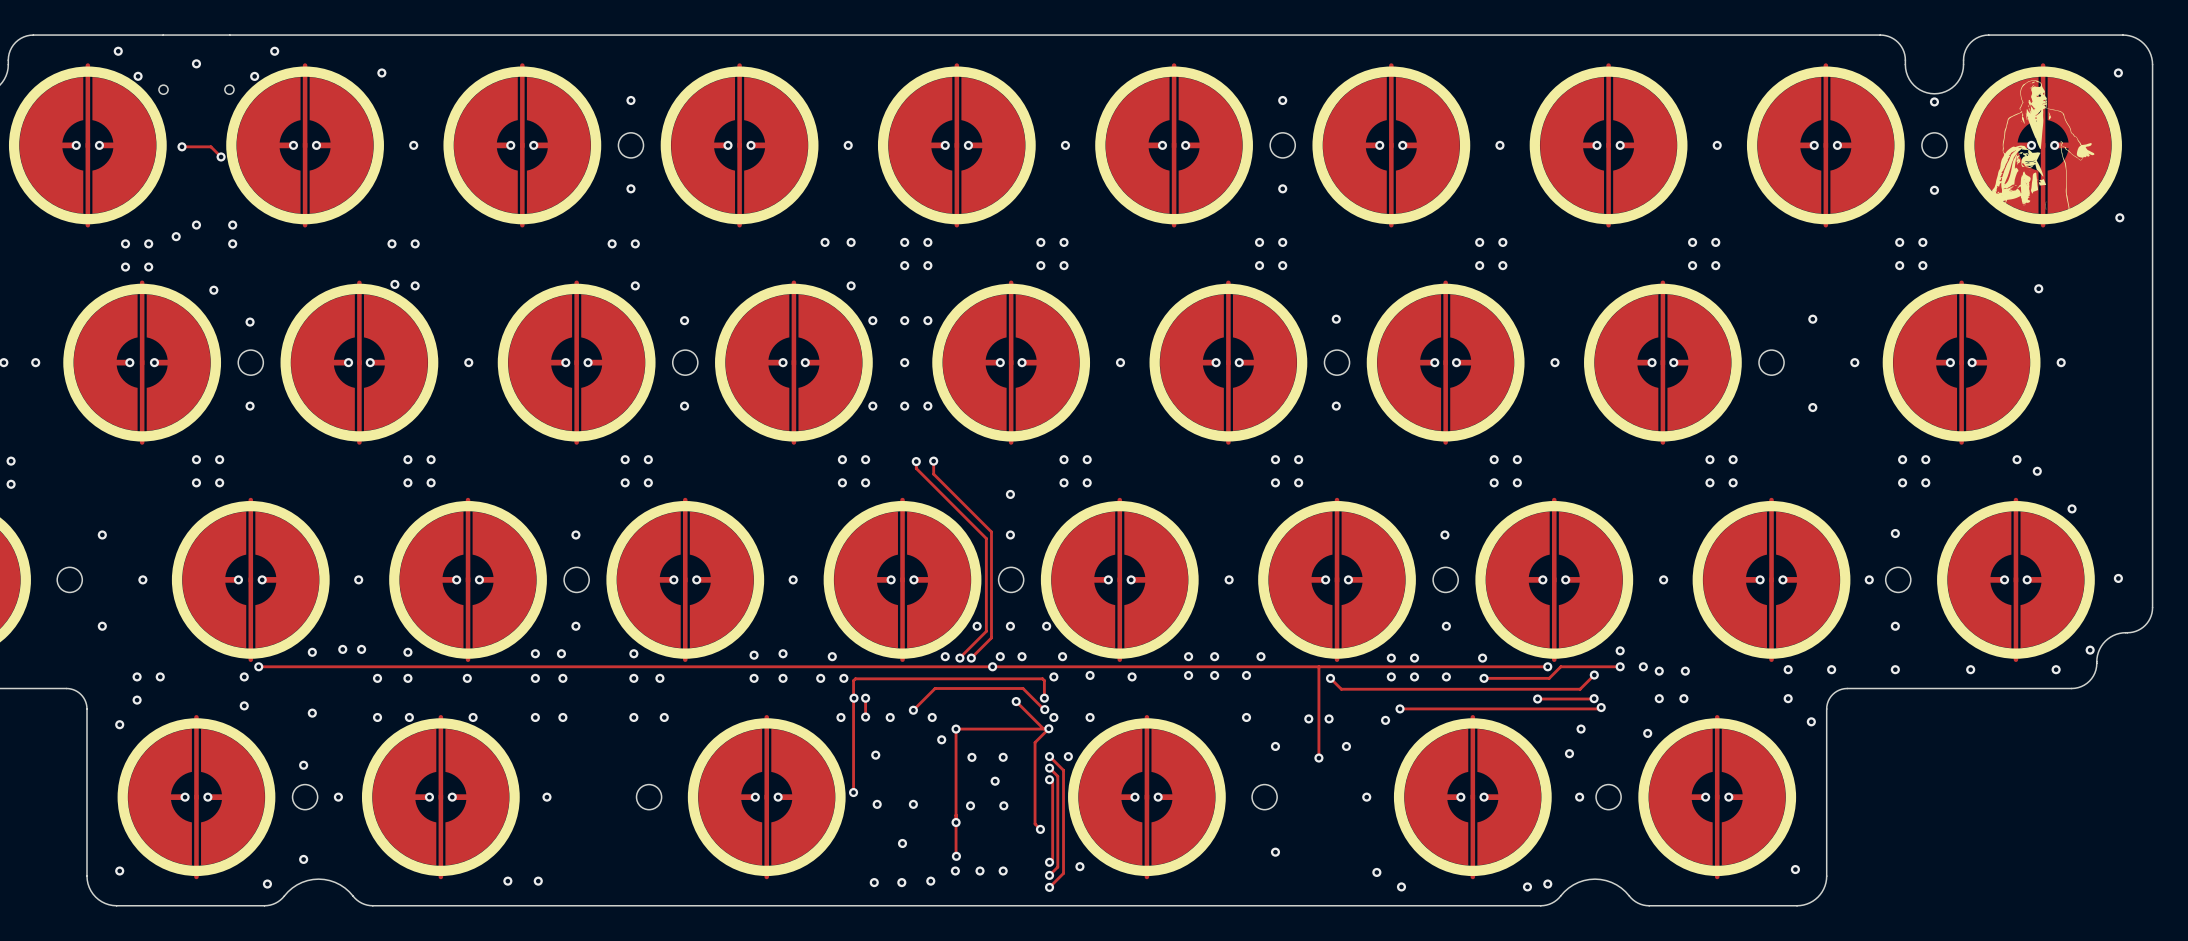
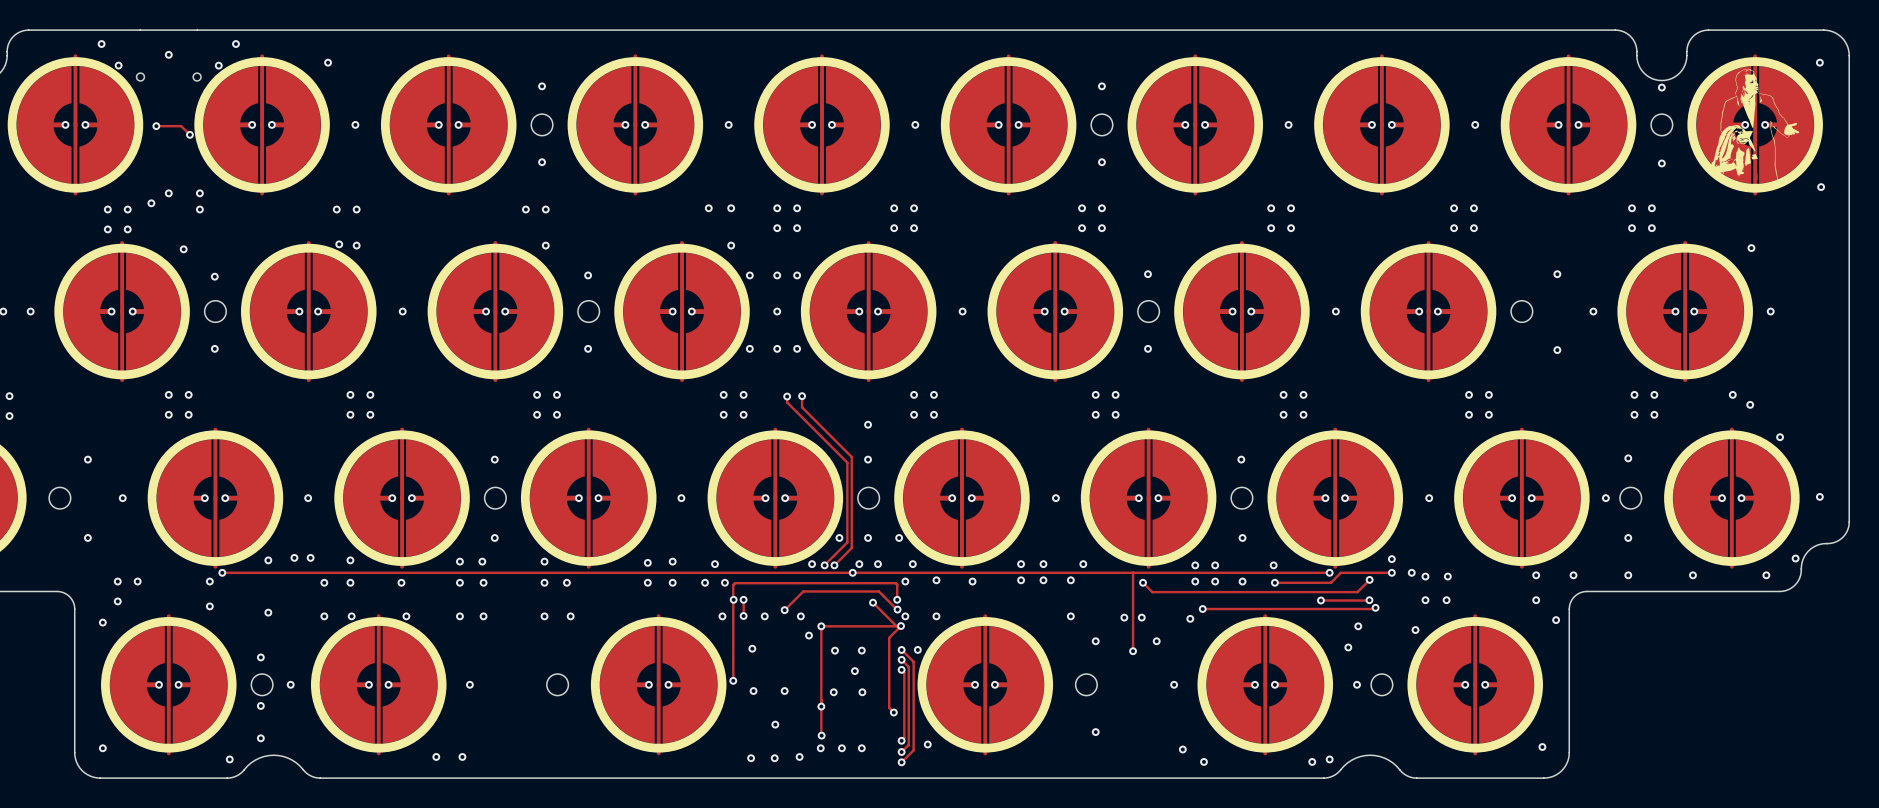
via: none -> (260, 705)

